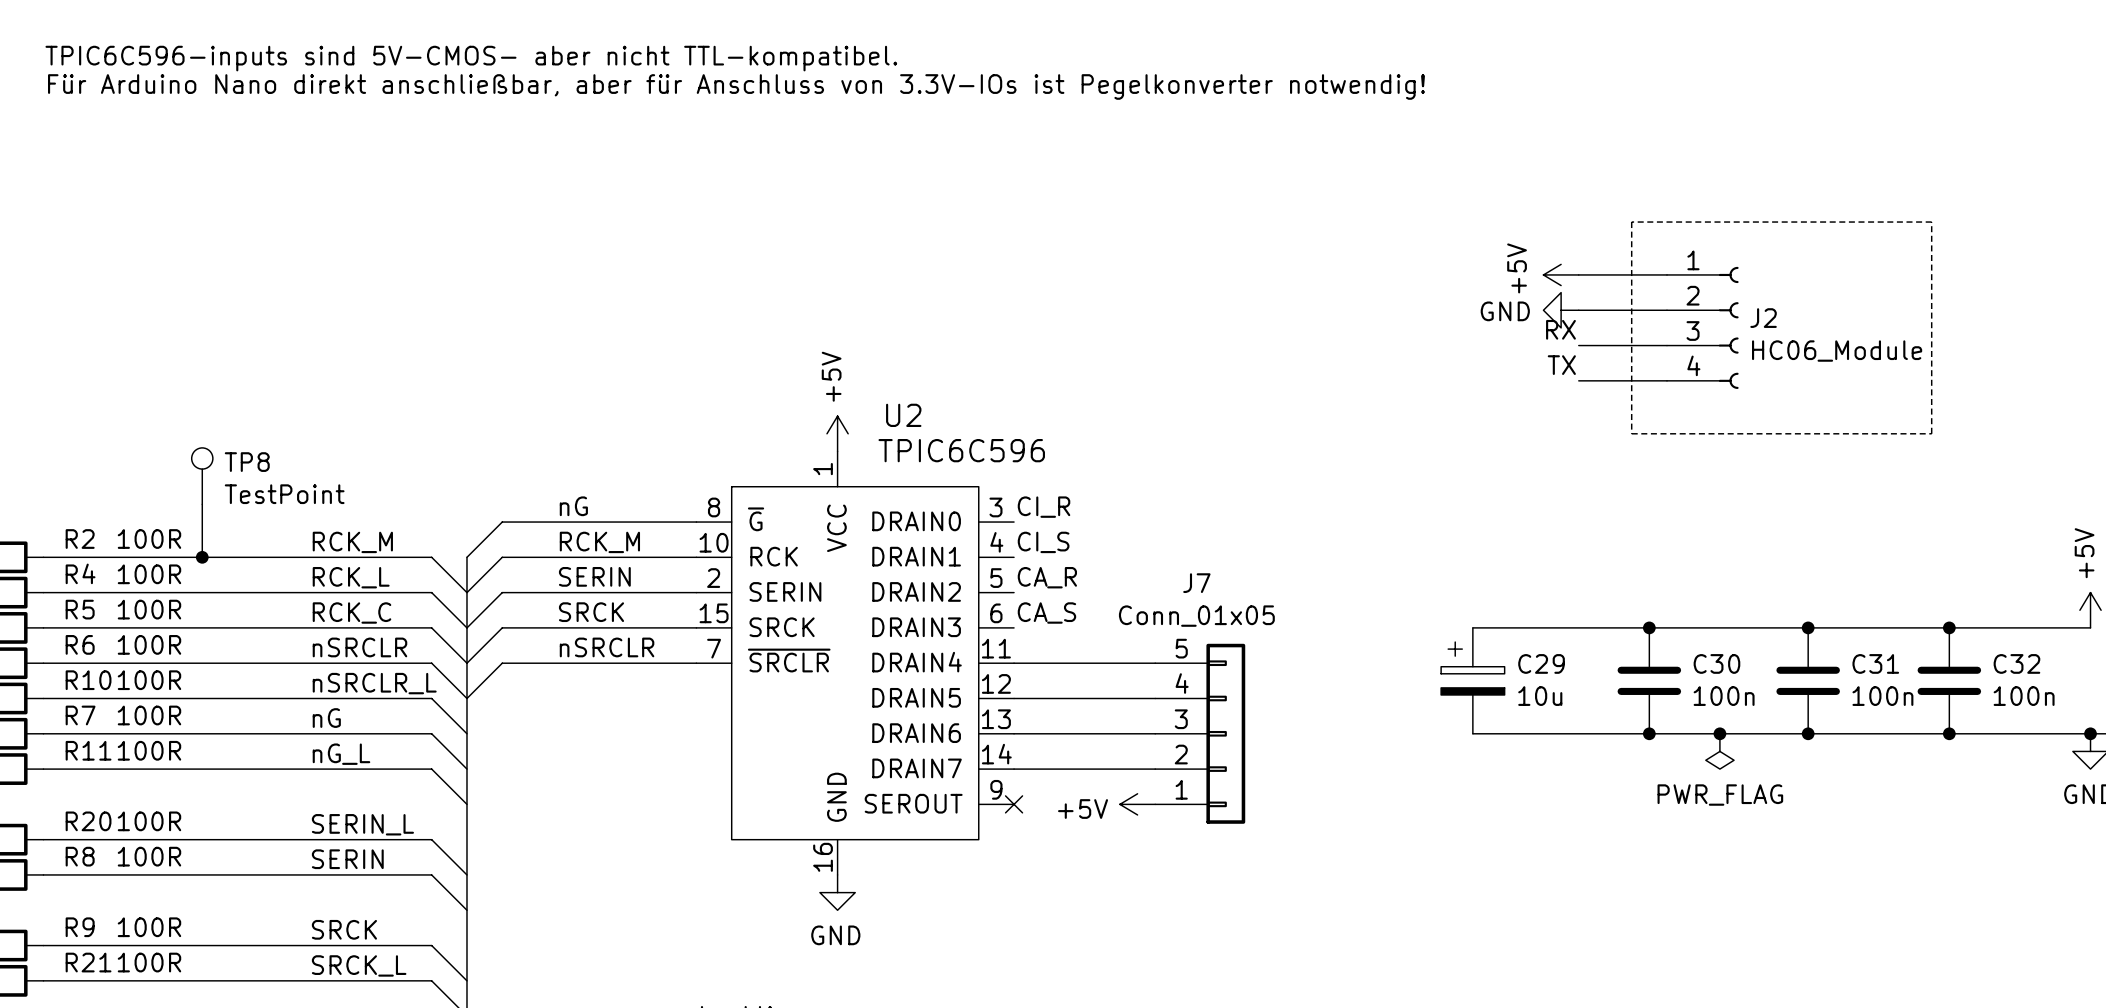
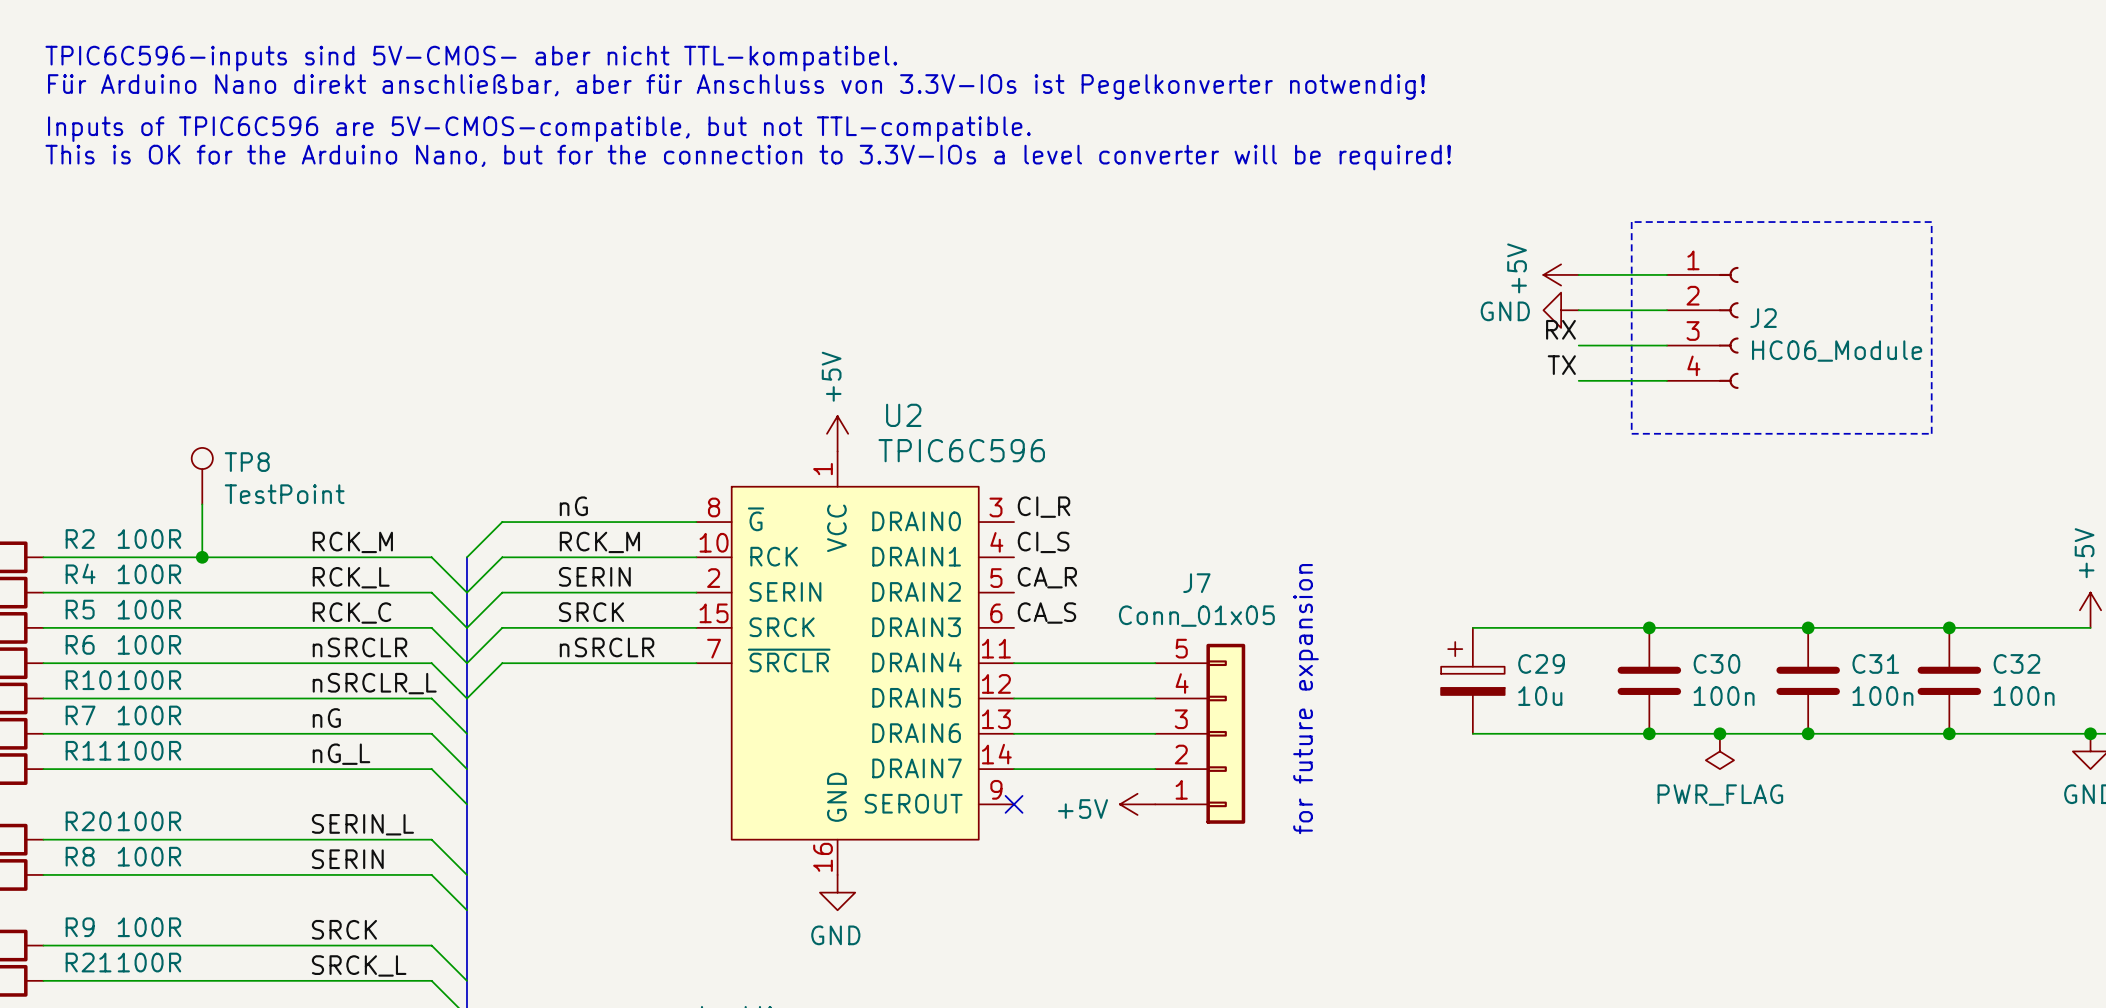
text: none -> Inputs of TPIC6C596 are 5V-CMOS-compatible, but not TTL-compatible. (539, 129)
text: none -> This is OK for the Arduino Nano, but for the connection to 3.3V-IOs a level converter will be required! (748, 157)
text: none -> for future expansion (1306, 699)

